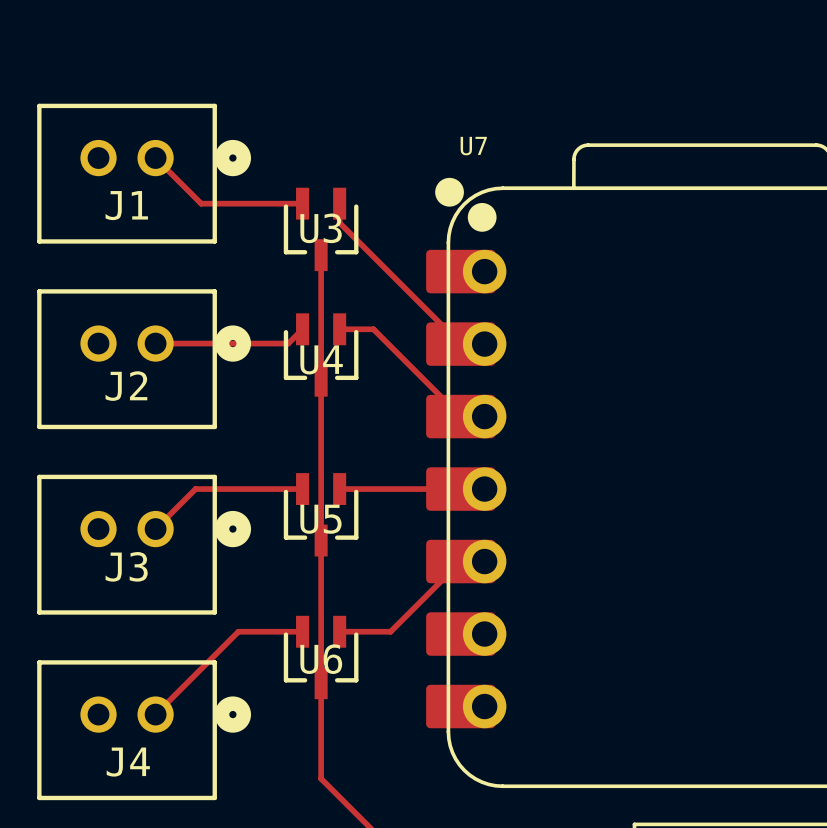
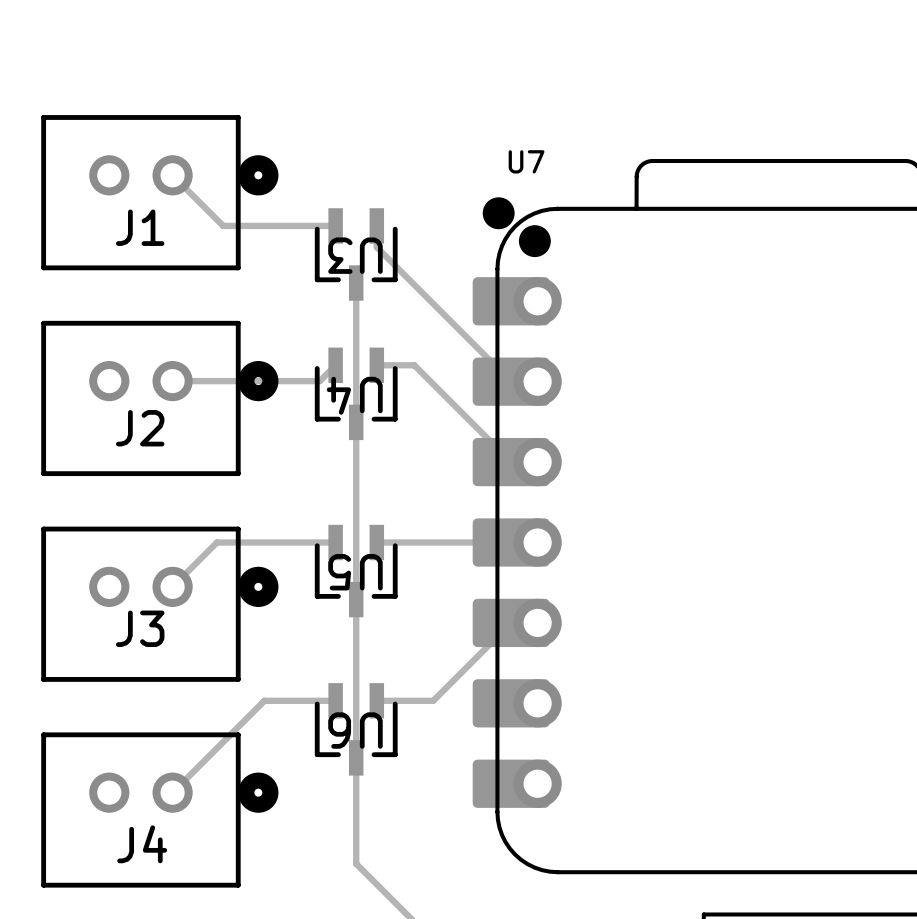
U3 name rotation: 0° (321, 228) -> 180° (355, 255)
U4 name rotation: 0° (321, 359) -> 180° (354, 395)
U5 name rotation: 0° (320, 519) -> 180° (355, 572)
U6 name rotation: 0° (321, 659) -> 180° (355, 730)

